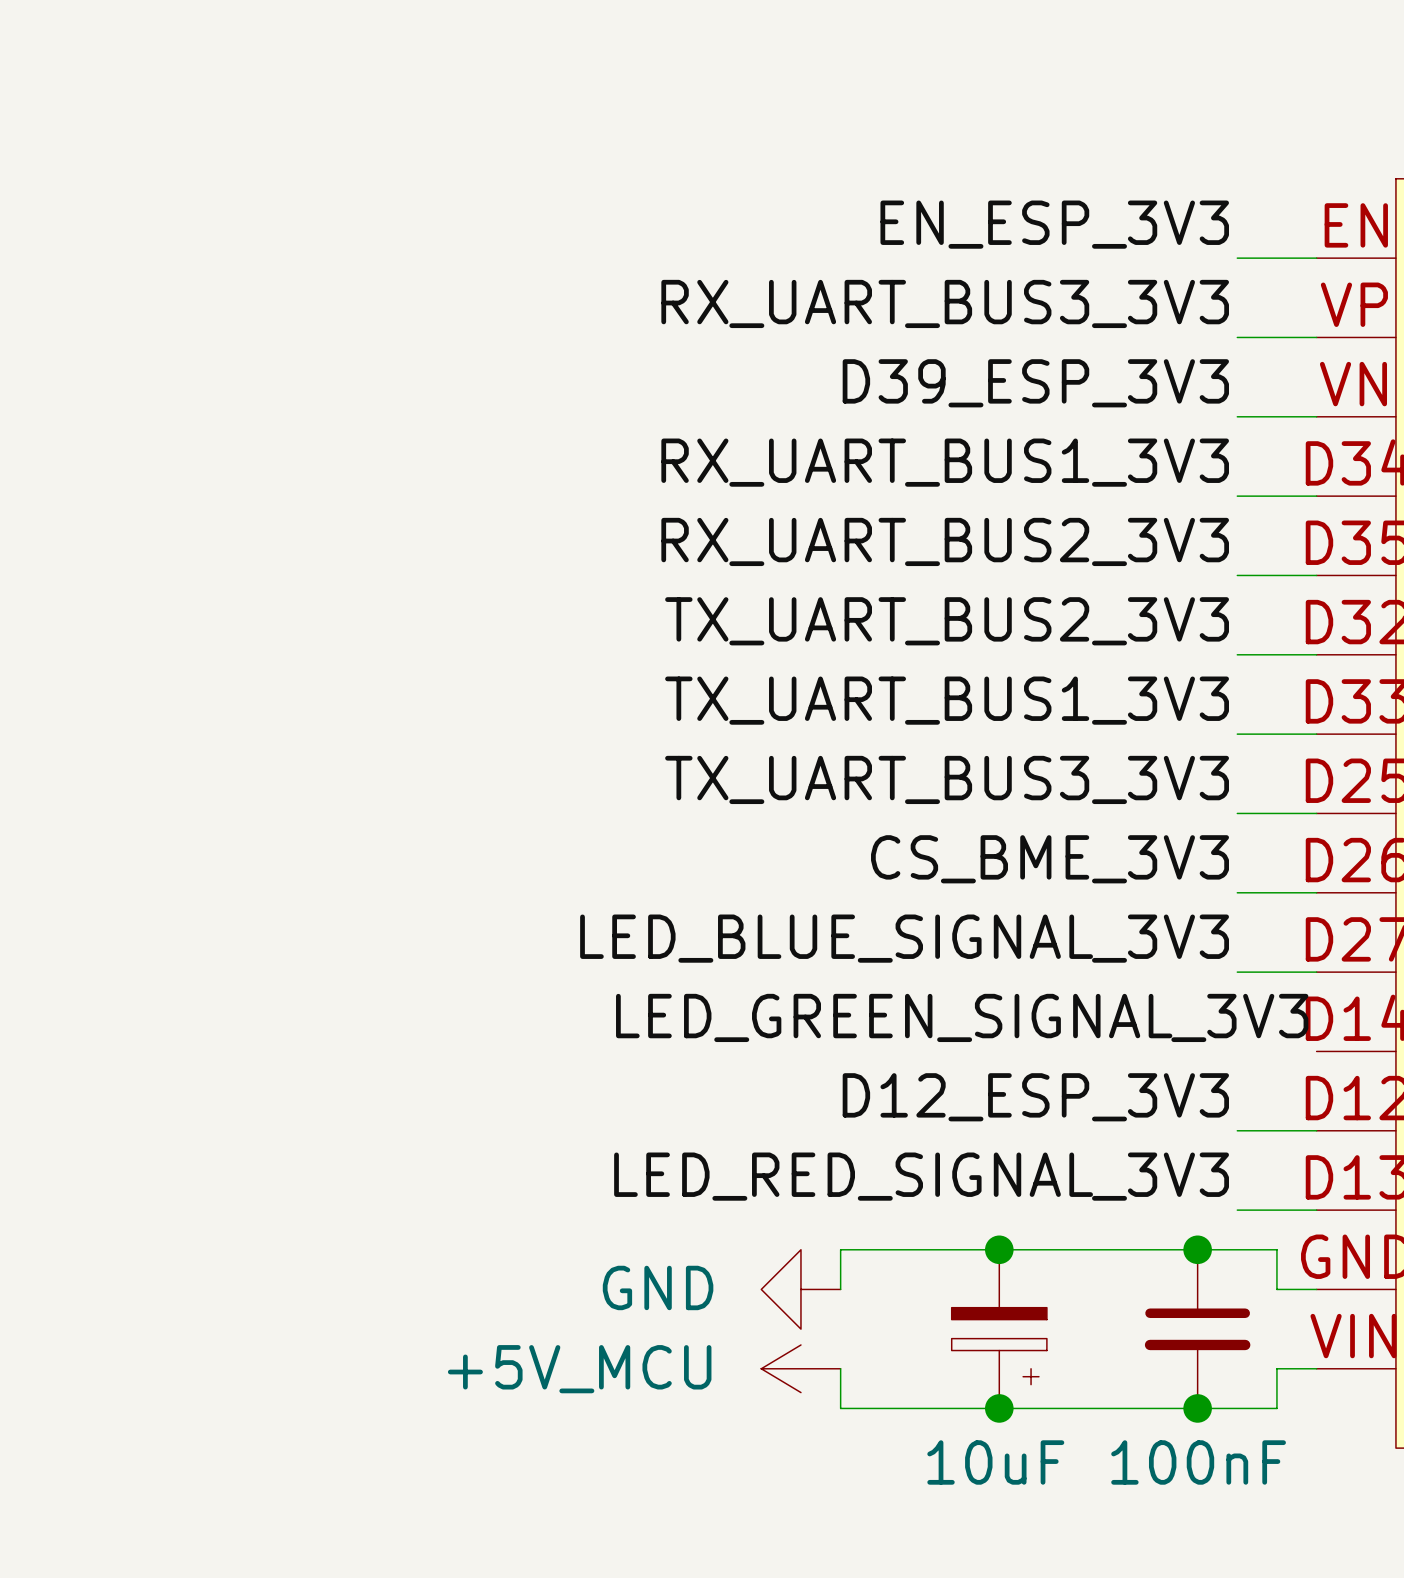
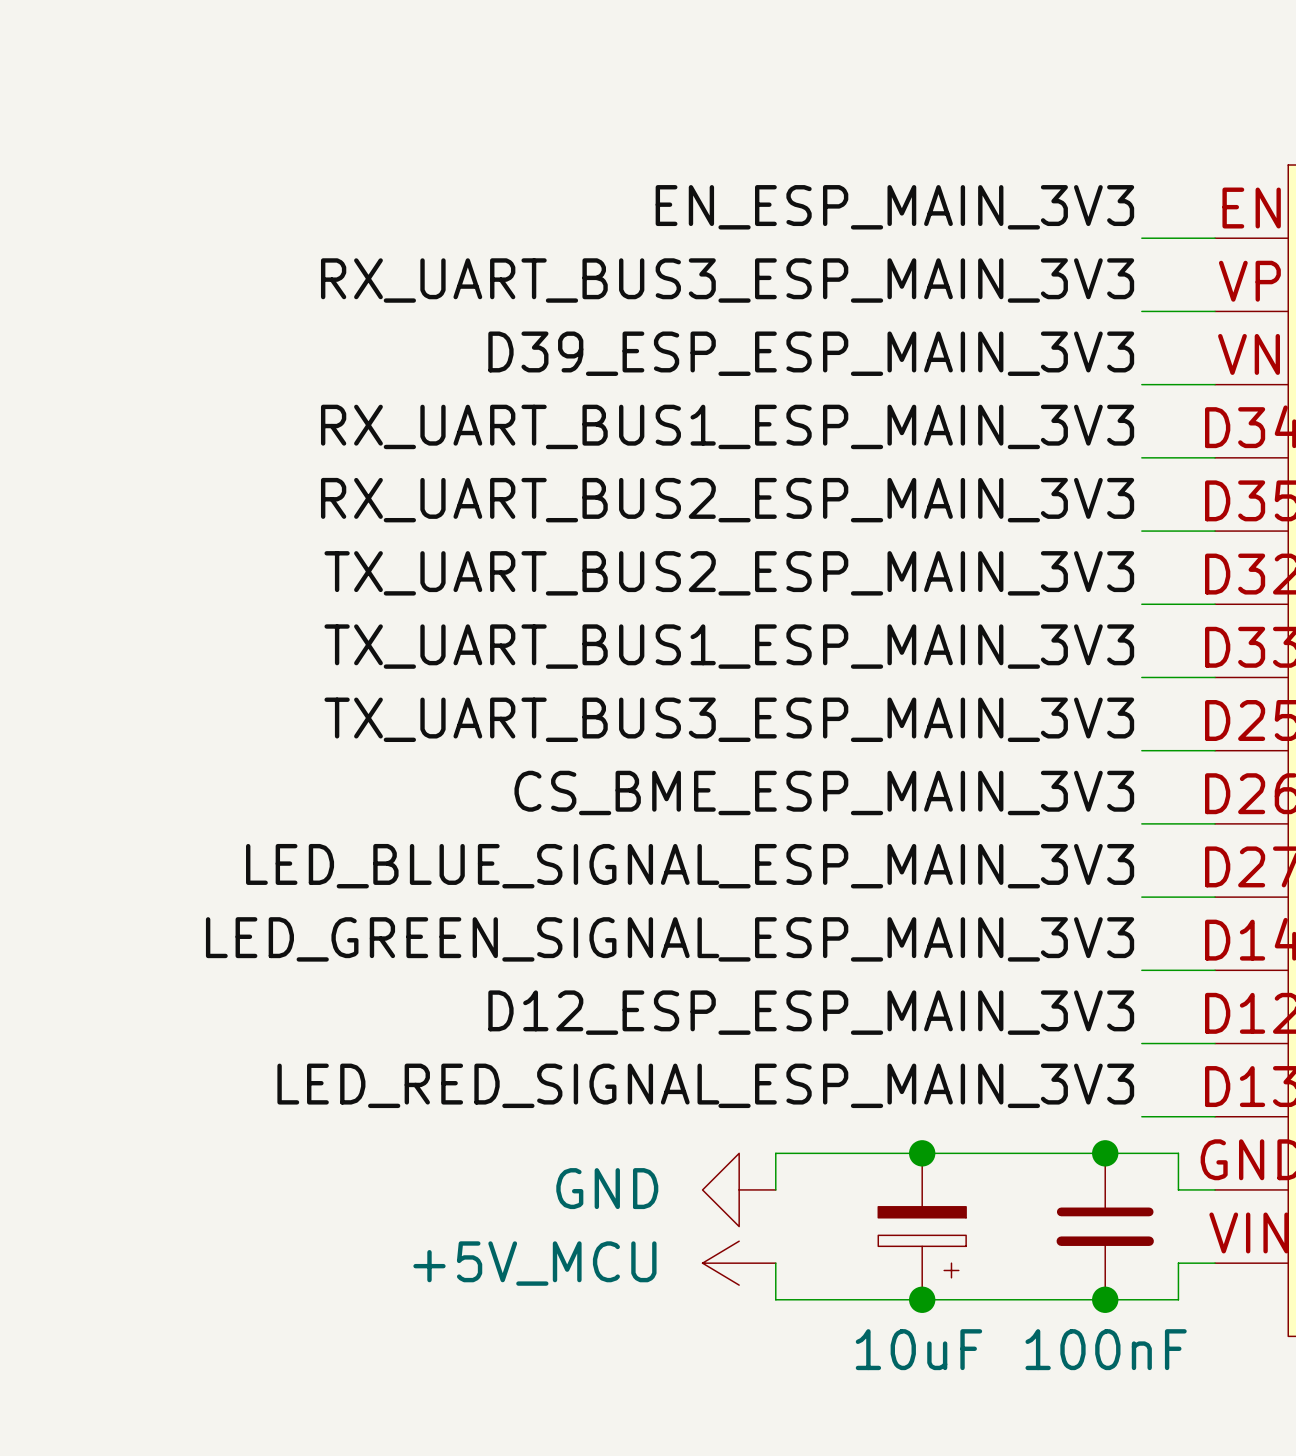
label: EN_ESP_3V3 (1054, 224) -> EN_ESP_MAIN_3V3 (894, 207)
label: RX_UART_BUS3_3V3 (945, 303) -> RX_UART_BUS3_ESP_MAIN_3V3 (727, 280)
label: D39_ESP_3V3 (1035, 383) -> D39_ESP_ESP_MAIN_3V3 (811, 353)
label: RX_UART_BUS1_3V3 (945, 462) -> RX_UART_BUS1_ESP_MAIN_3V3 (727, 426)
label: RX_UART_BUS2_3V3 (945, 541) -> RX_UART_BUS2_ESP_MAIN_3V3 (727, 500)
label: TX_UART_BUS2_3V3 (947, 621) -> TX_UART_BUS2_ESP_MAIN_3V3 (729, 573)
label: TX_UART_BUS1_3V3 (947, 700) -> TX_UART_BUS1_ESP_MAIN_3V3 (729, 646)
label: TX_UART_BUS3_3V3 (947, 779) -> TX_UART_BUS3_ESP_MAIN_3V3 (729, 719)
label: CS_BME_3V3 (1050, 859) -> CS_BME_ESP_MAIN_3V3 (824, 792)
label: LED_BLUE_SIGNAL_3V3 (904, 938) -> LED_BLUE_SIGNAL_ESP_MAIN_3V3 (690, 866)
label: LED_GREEN_SIGNAL_3V3 (962, 1017) -> LED_GREEN_SIGNAL_ESP_MAIN_3V3 (670, 939)
wire: none -> (1141, 970) (1215, 970)
label: D12_ESP_3V3 (1035, 1097) -> D12_ESP_ESP_MAIN_3V3 (811, 1012)
label: LED_RED_SIGNAL_3V3 (921, 1176) -> LED_RED_SIGNAL_ESP_MAIN_3V3 (705, 1085)

